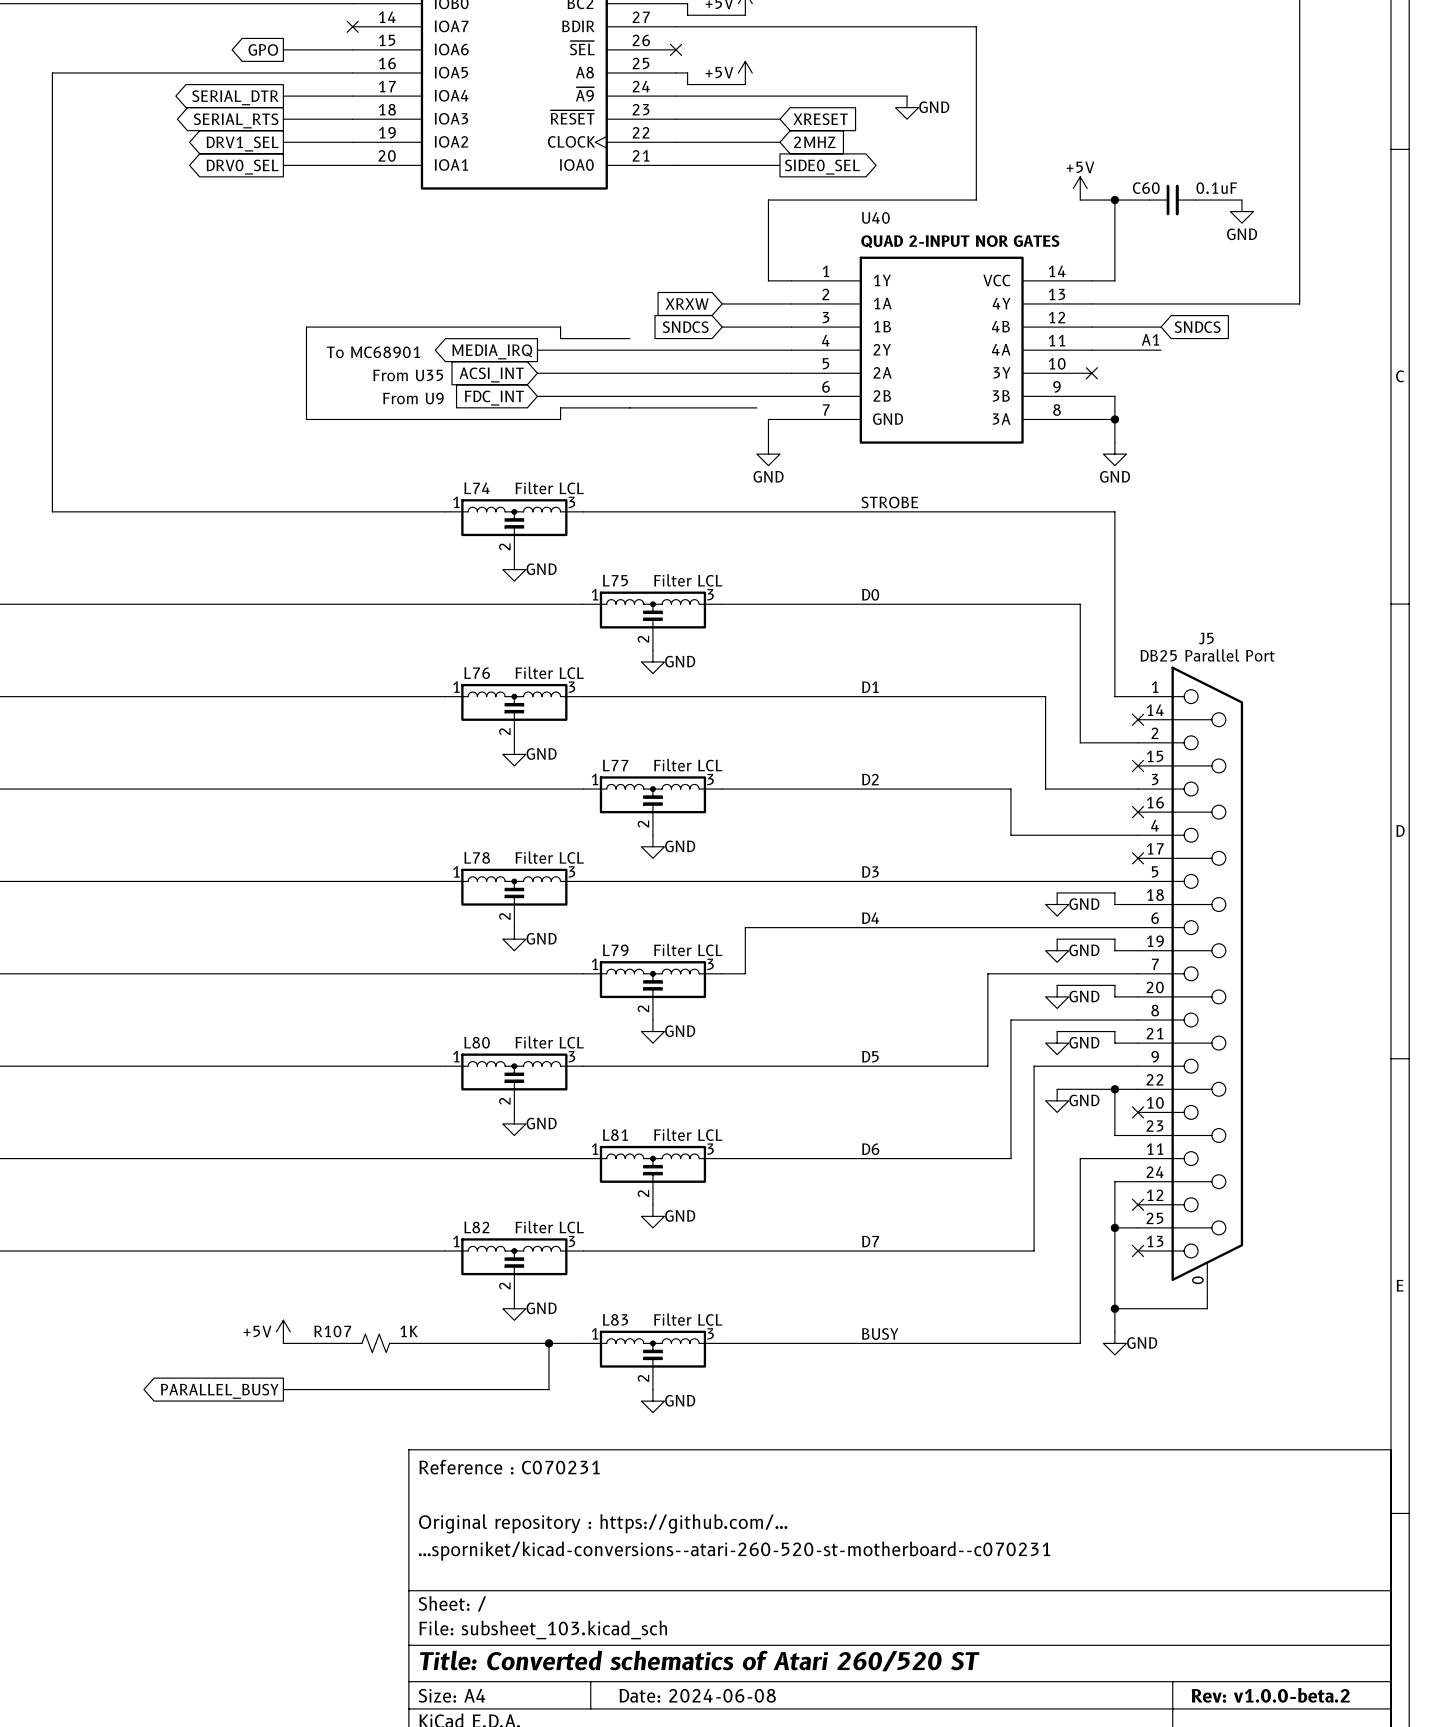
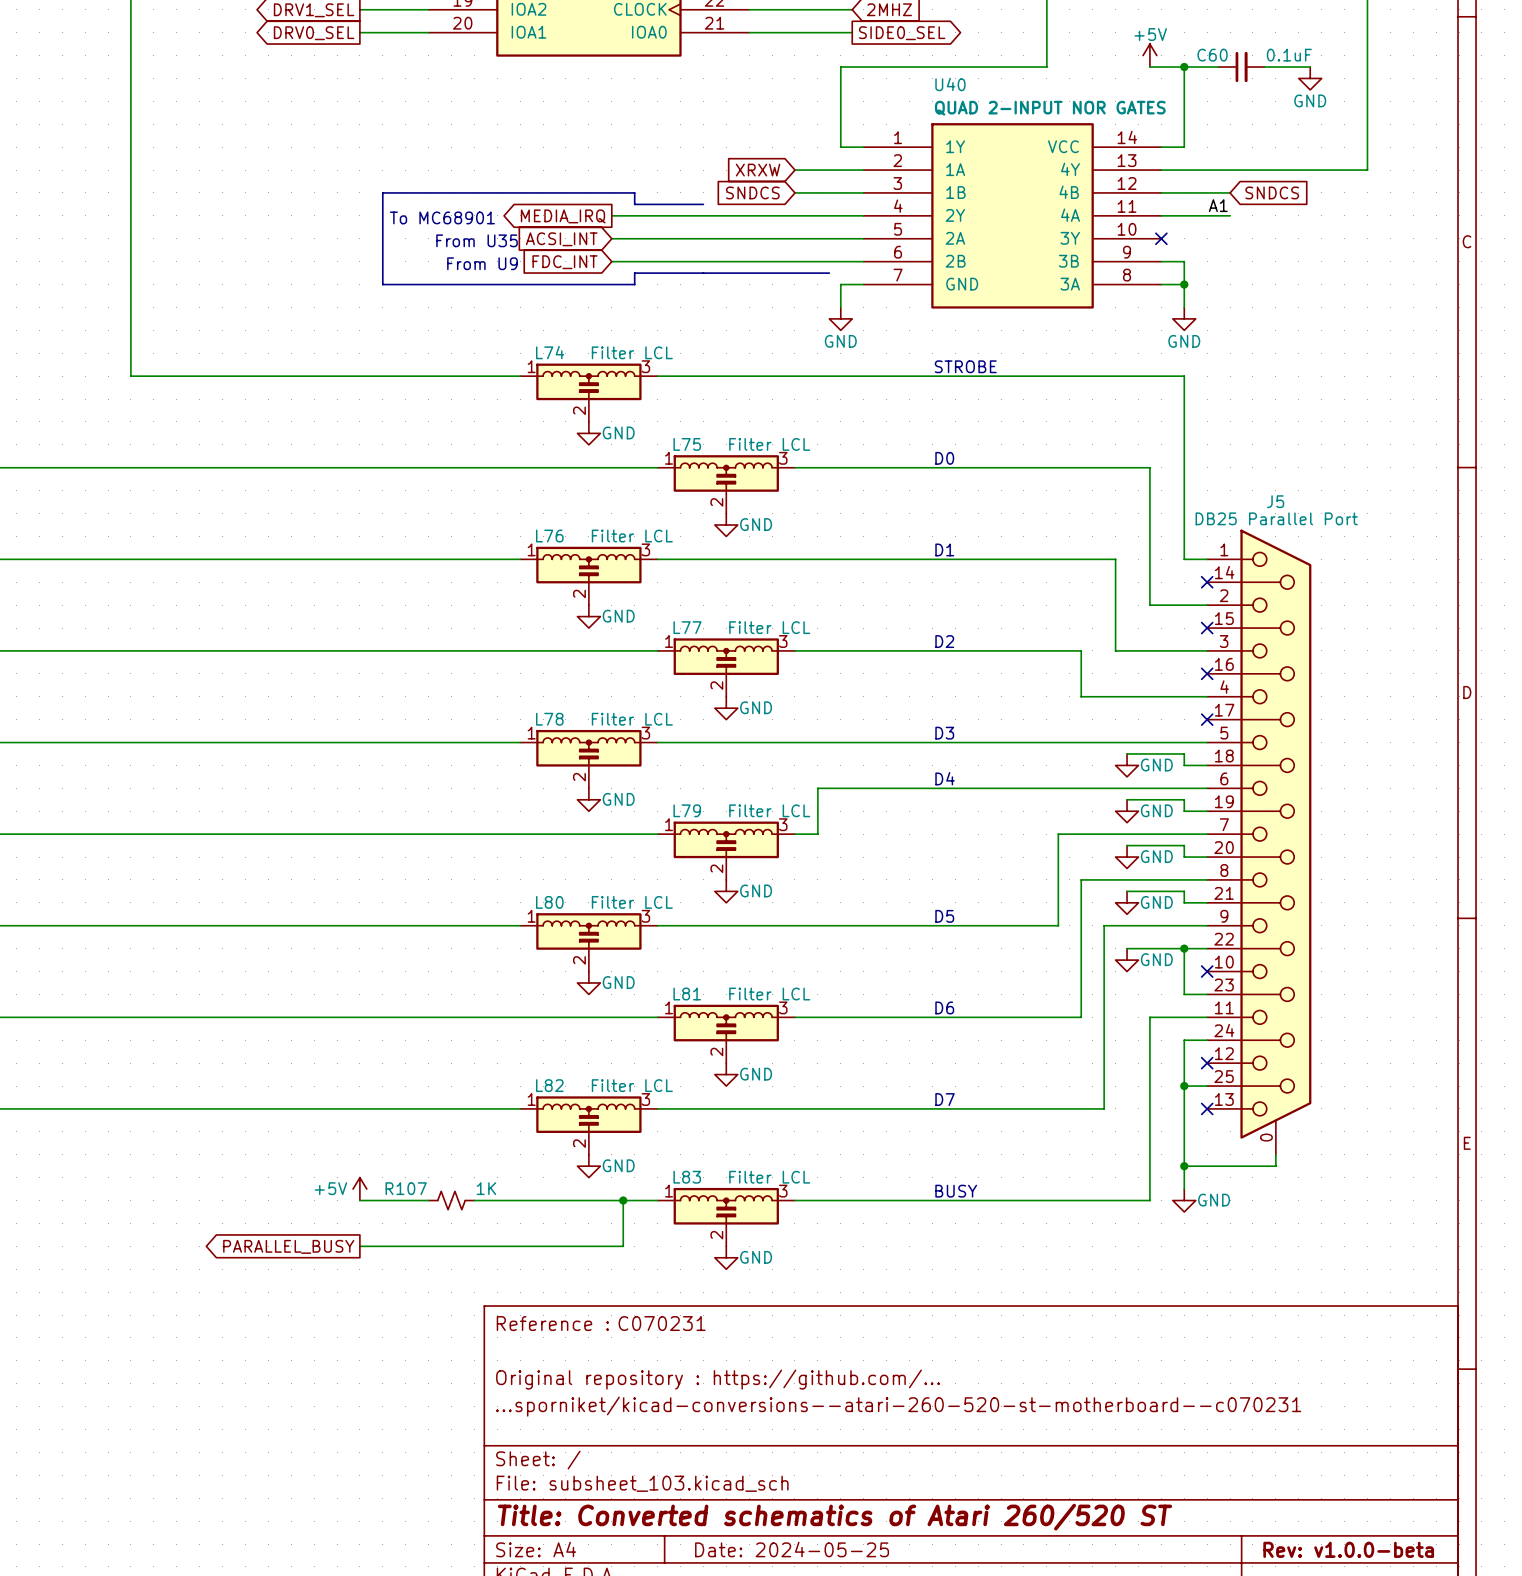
title block: Date: 2024-06-08 (697, 1695) -> Date: 2024-05-25 (792, 1549)
title block: Rev: v1.0.0-beta.2 (1270, 1695) -> Rev: v1.0.0-beta (1348, 1549)

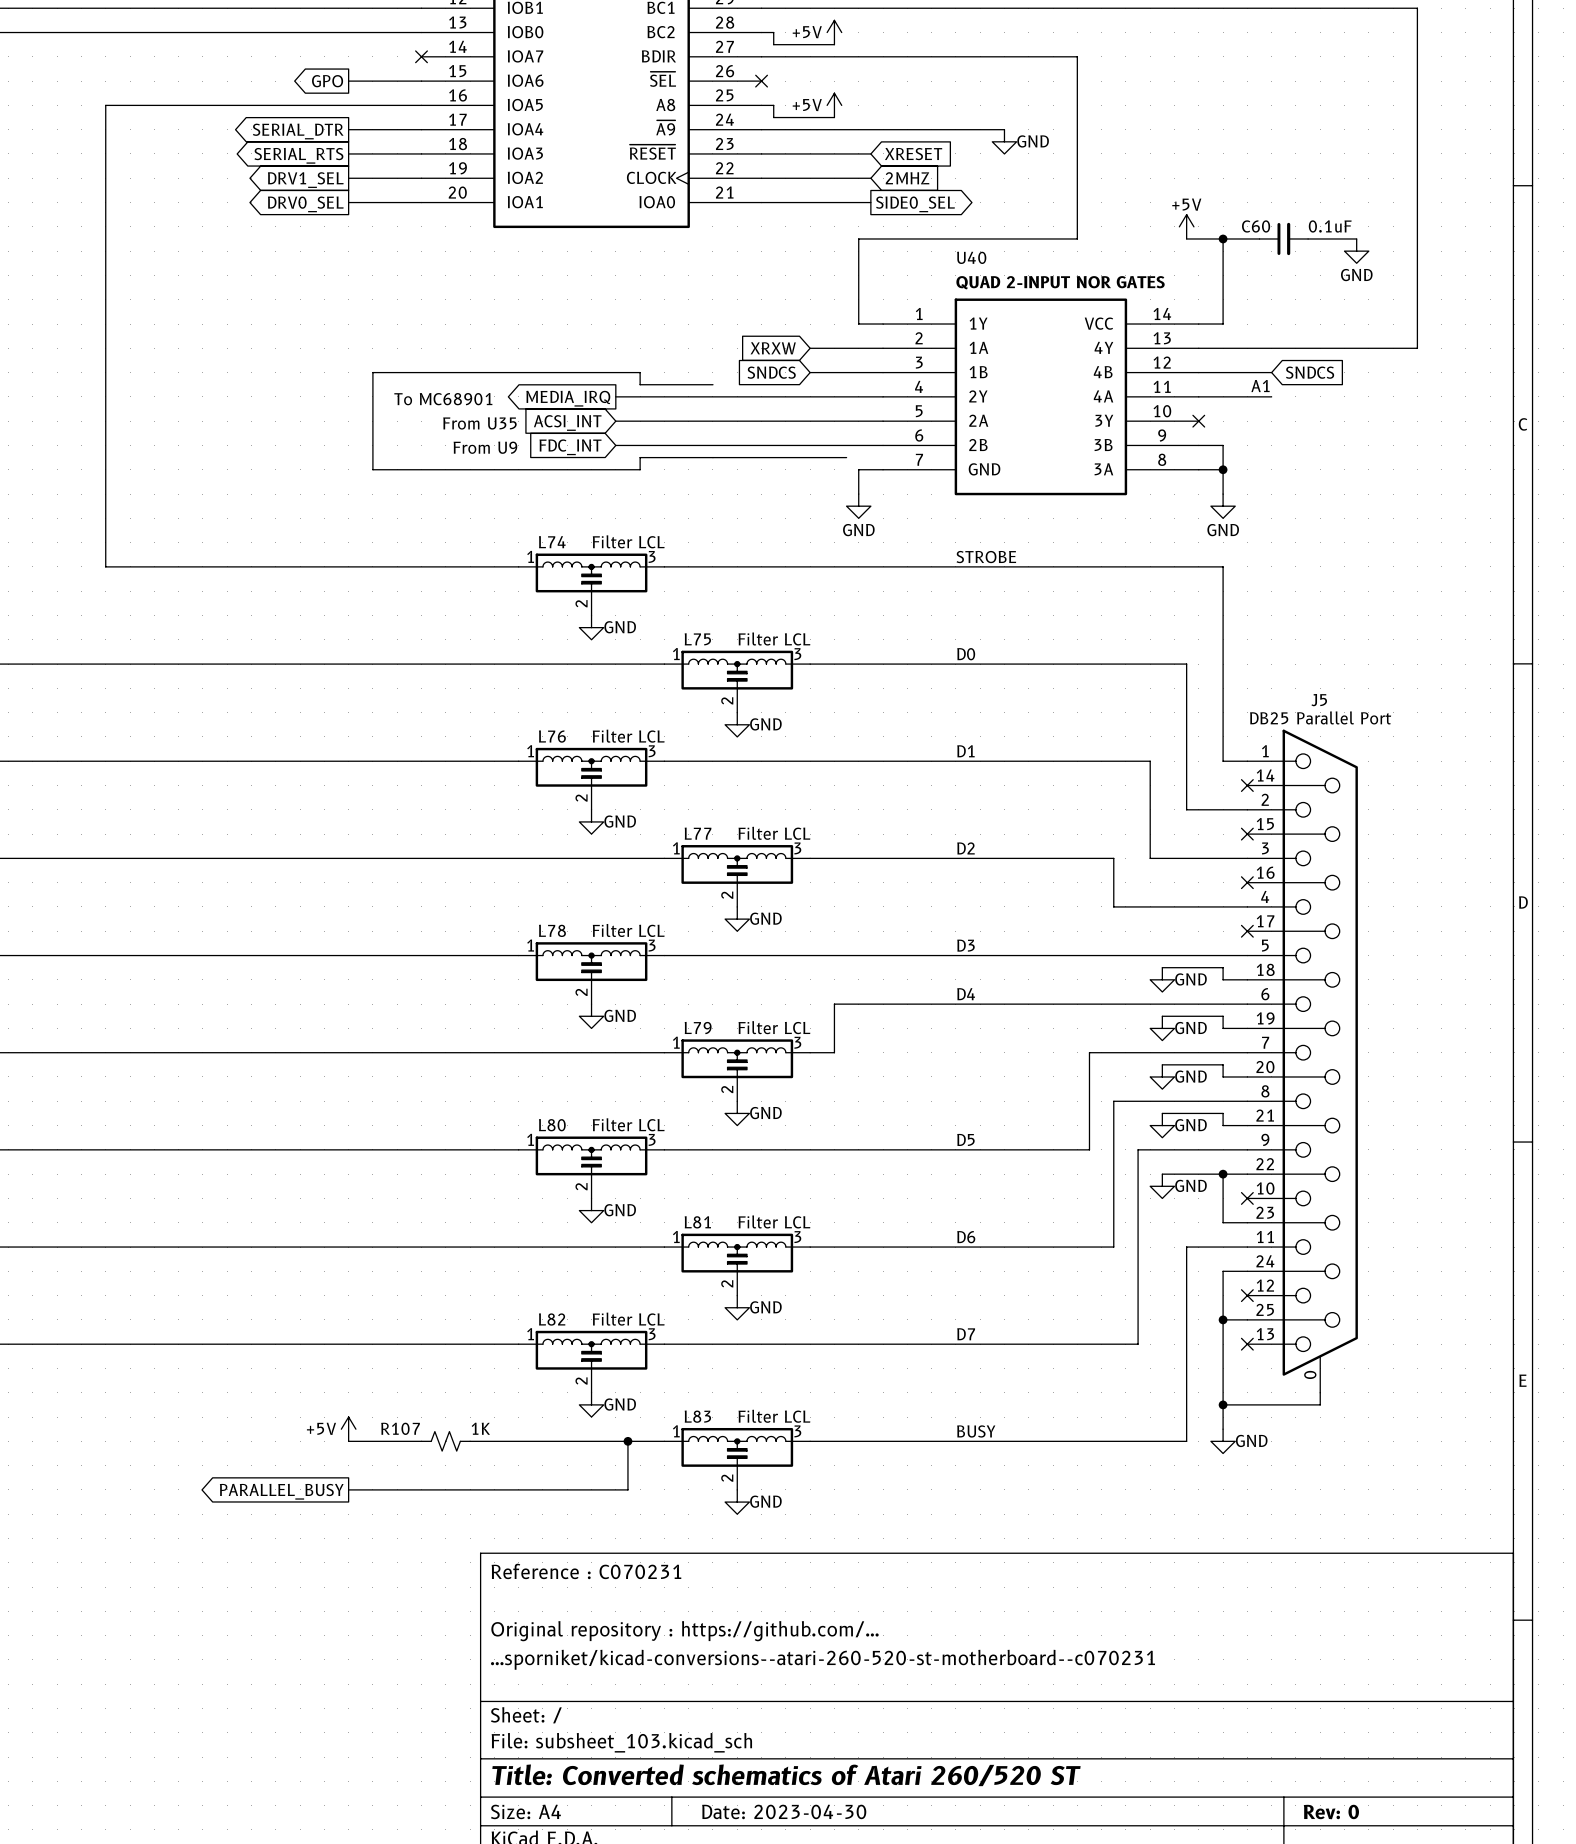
title block: Date: 2024-05-25 (792, 1549) -> Date: 2023-04-30 (784, 1811)
title block: Rev: v1.0.0-beta (1348, 1549) -> Rev: 0 (1331, 1812)

